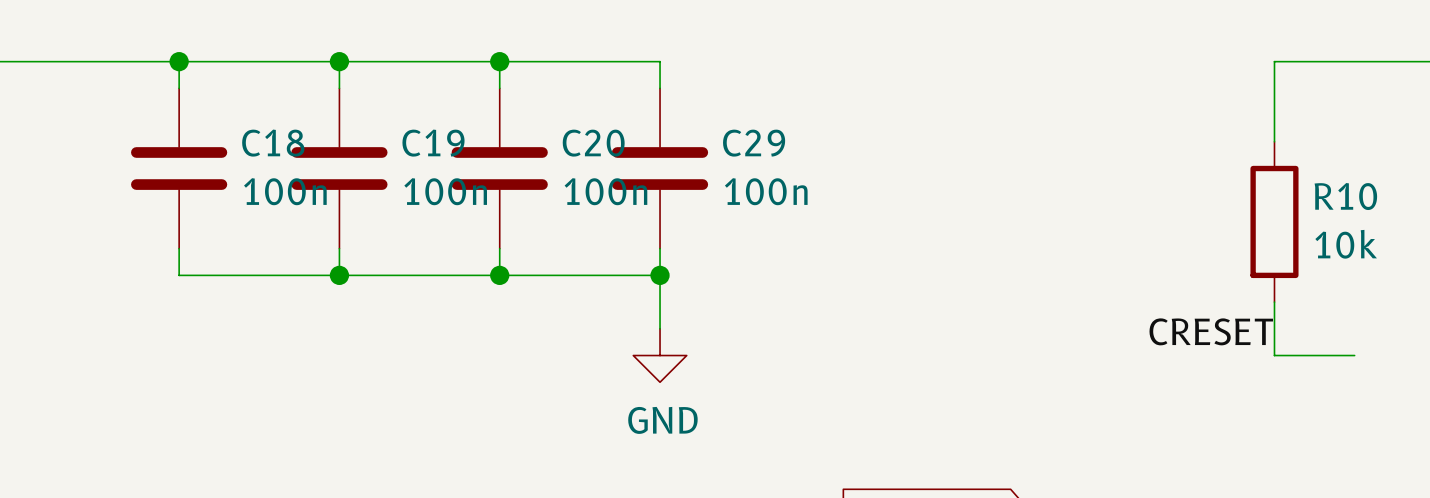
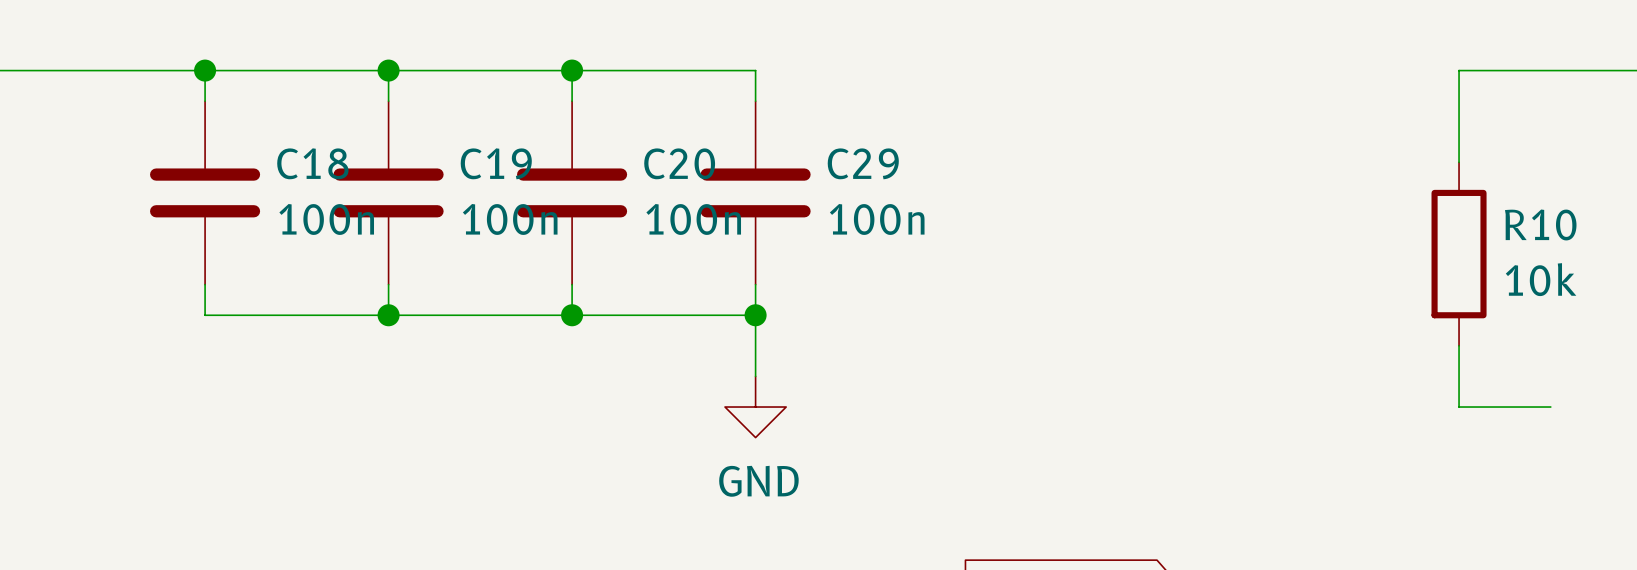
label: CRESET (1211, 331) -> none

